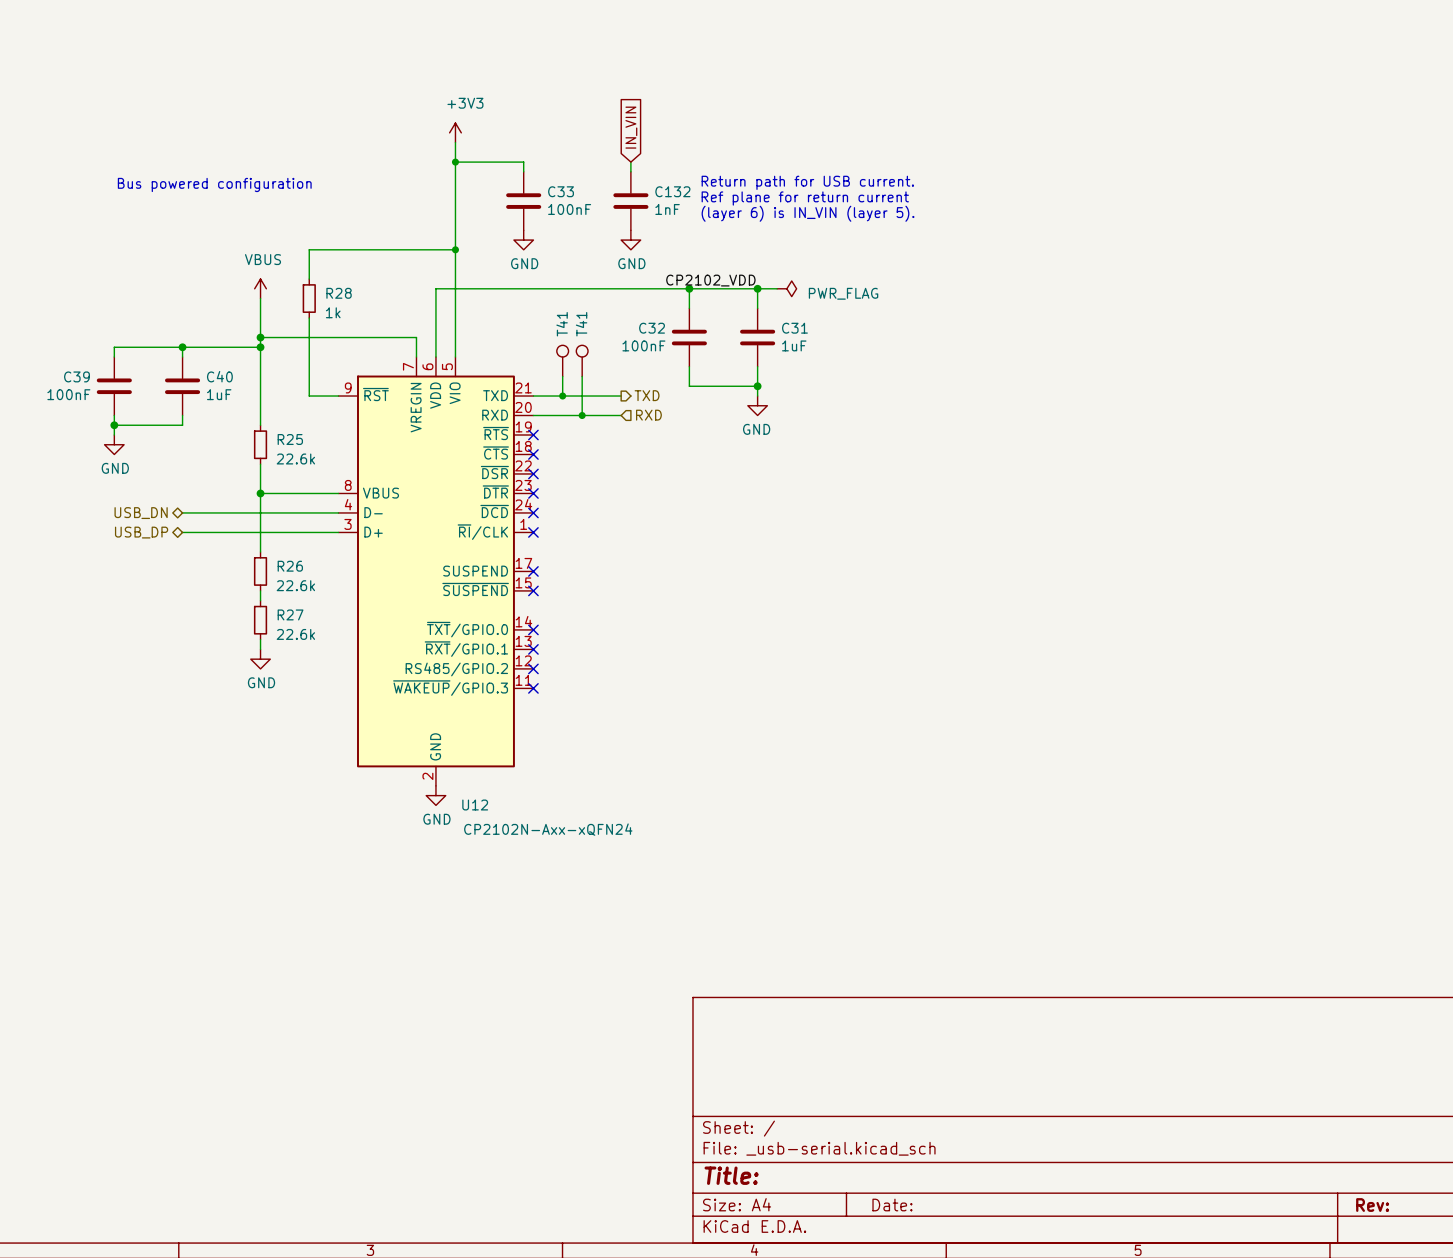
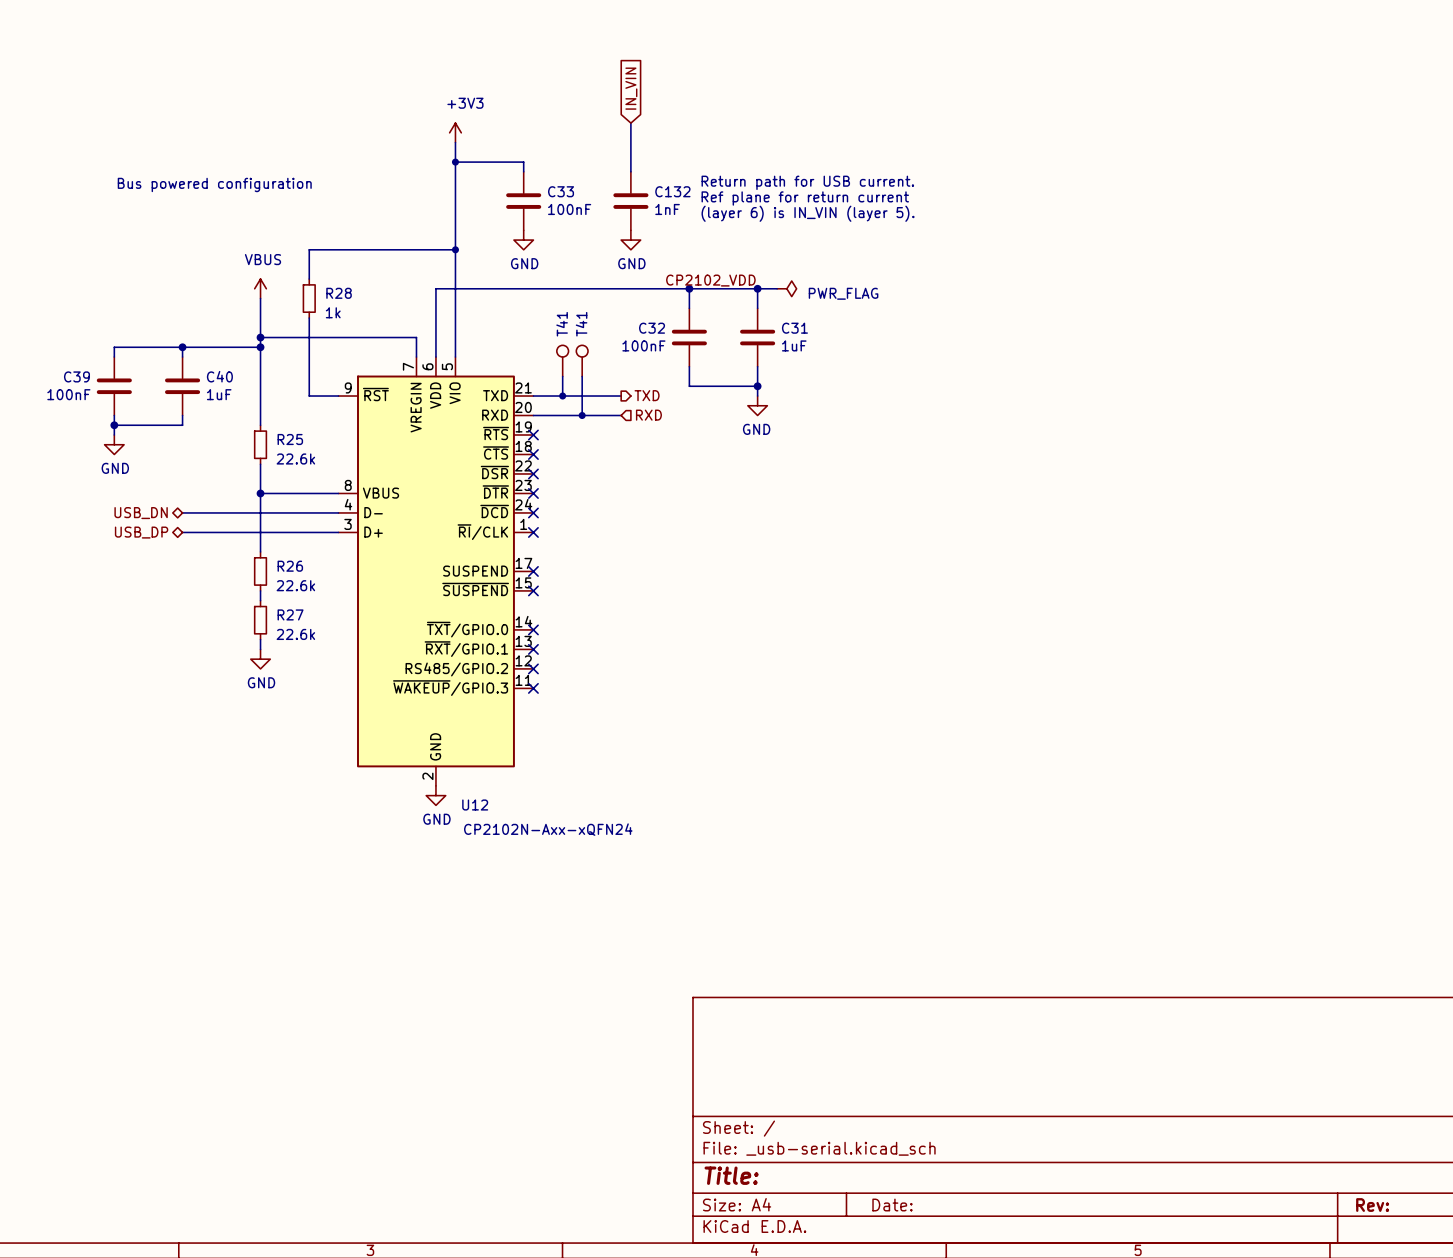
wire: none -> (630, 123) (630, 162)
global label position: IN_VIN (631, 127) -> IN_VIN (631, 88)

